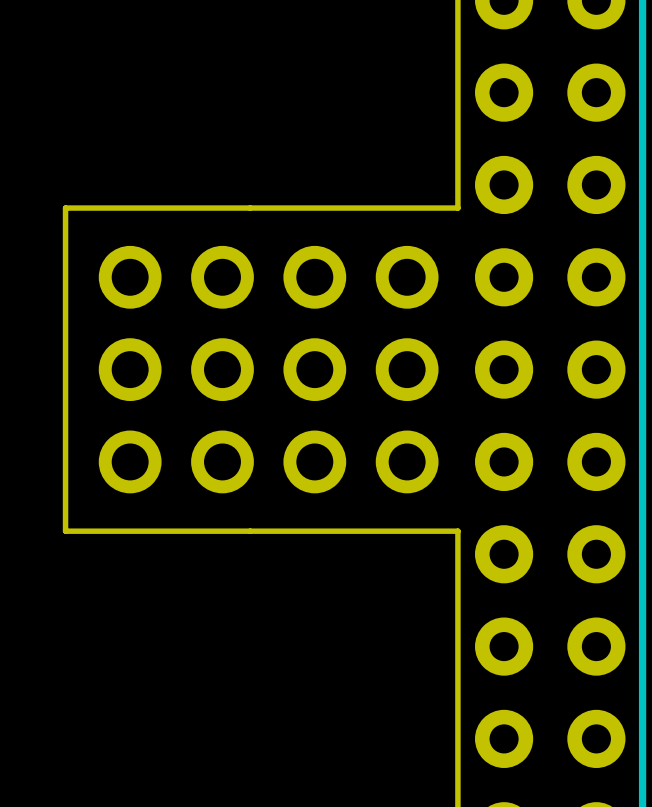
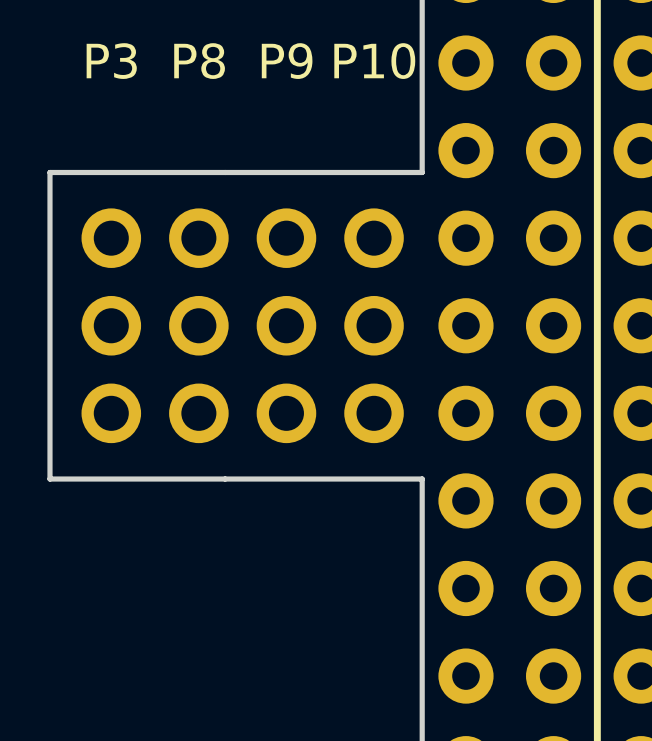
P3 name: none -> P3 (111, 61)
P8 name: none -> P8 (199, 61)
P9 name: none -> P9 (287, 61)
P10 name: none -> P10 (374, 61)

